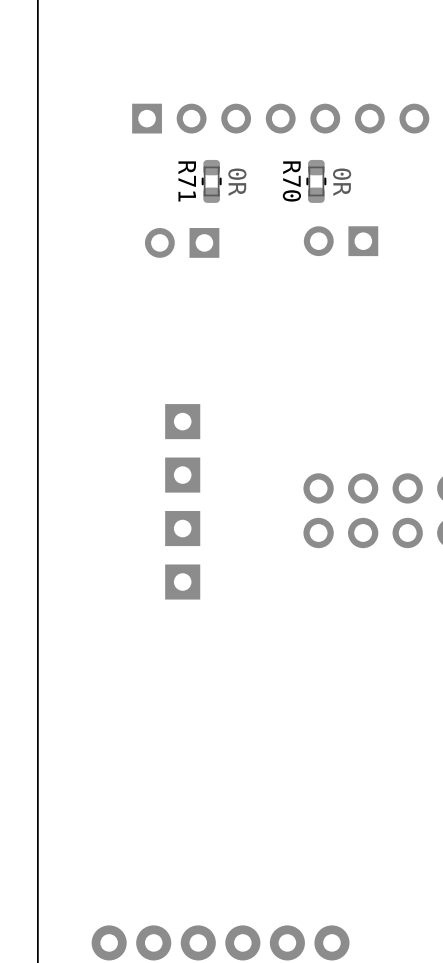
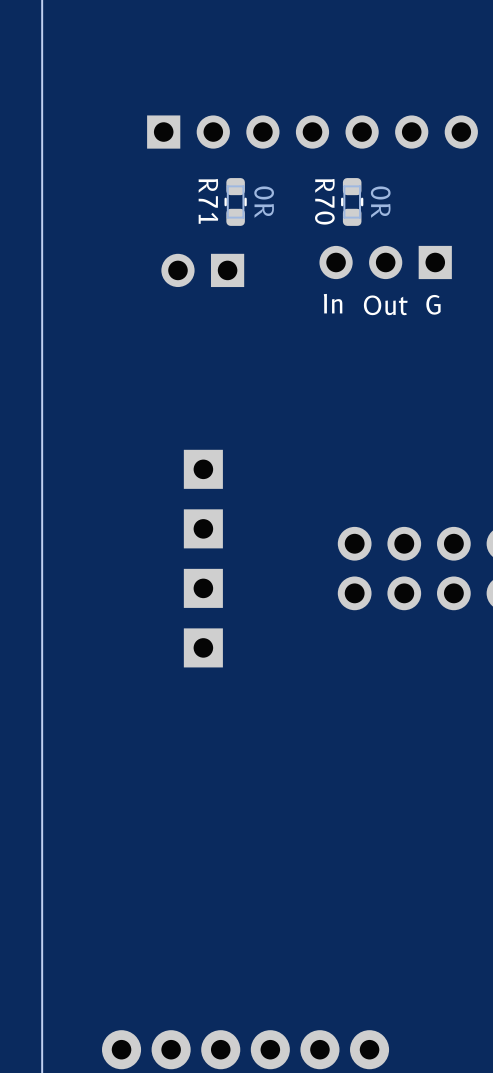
part footprint: [303, 226, 379, 257] -> [319, 245, 452, 280]
text: none -> In (333, 303)
text: none -> G (433, 304)
text: none -> Out (385, 305)

